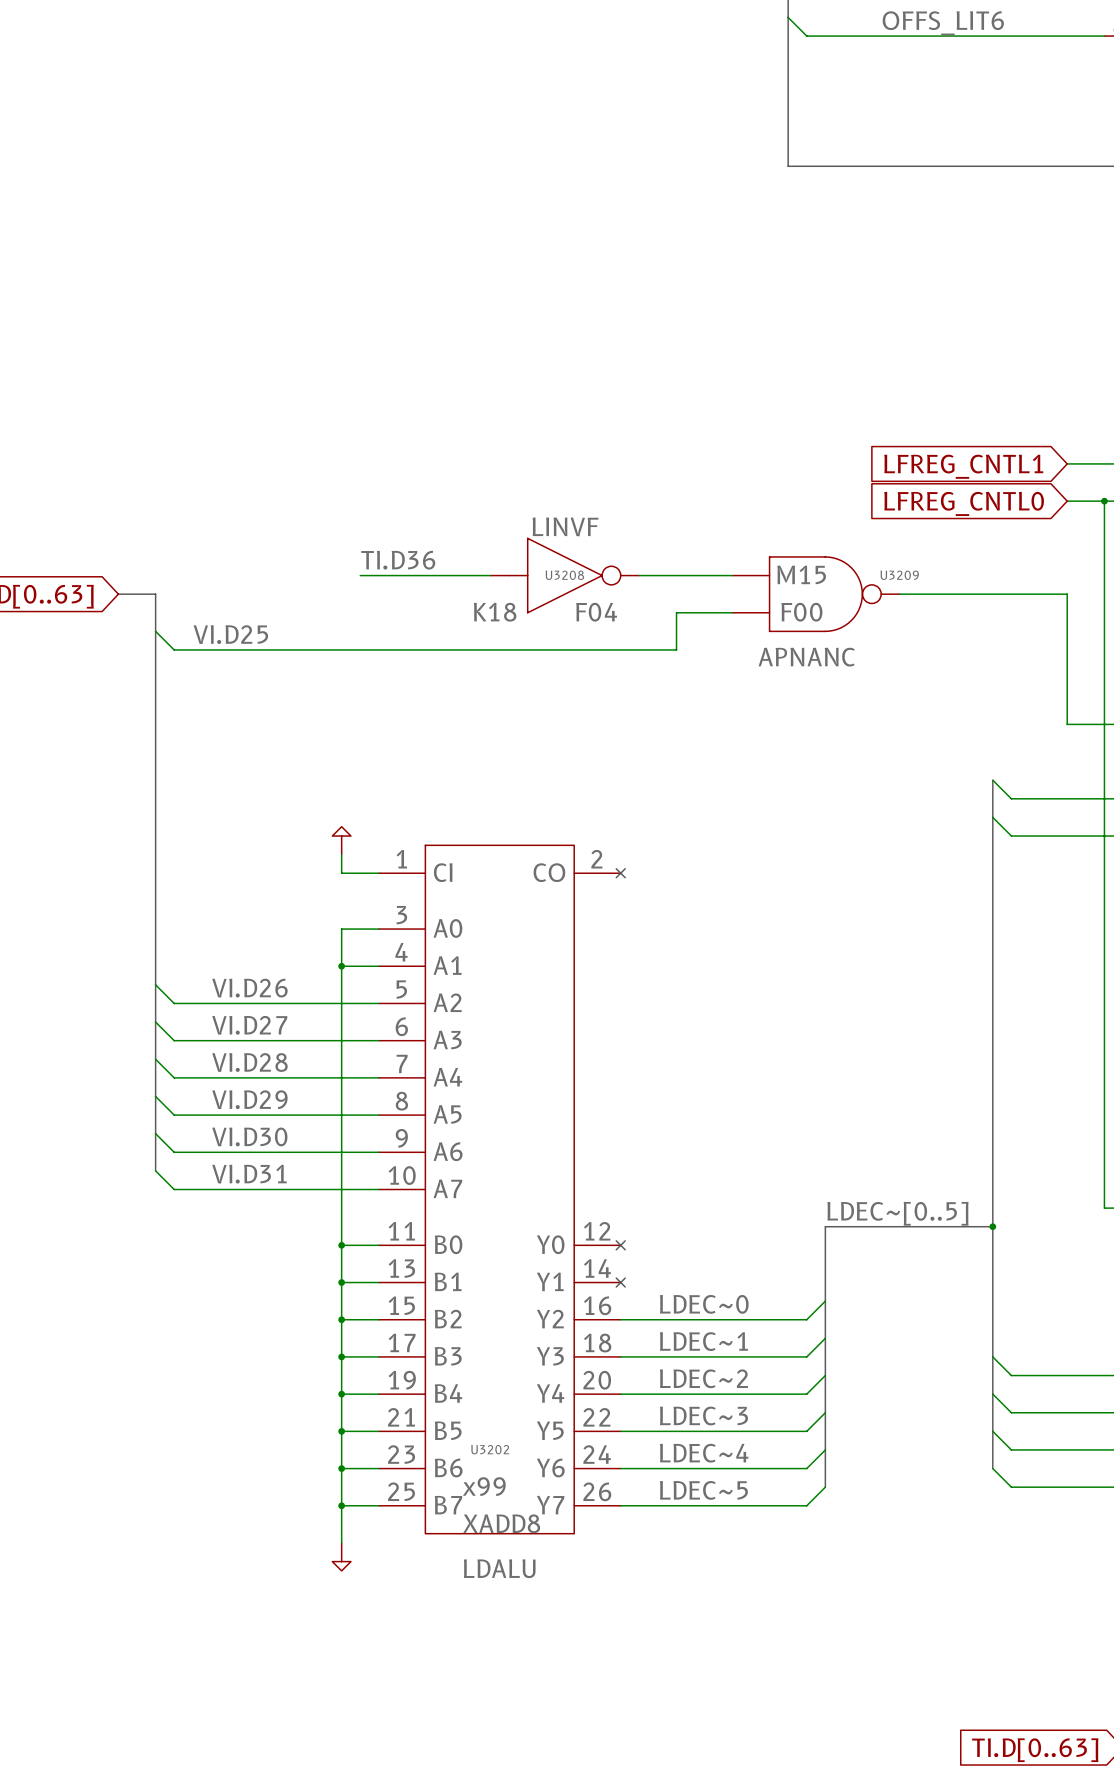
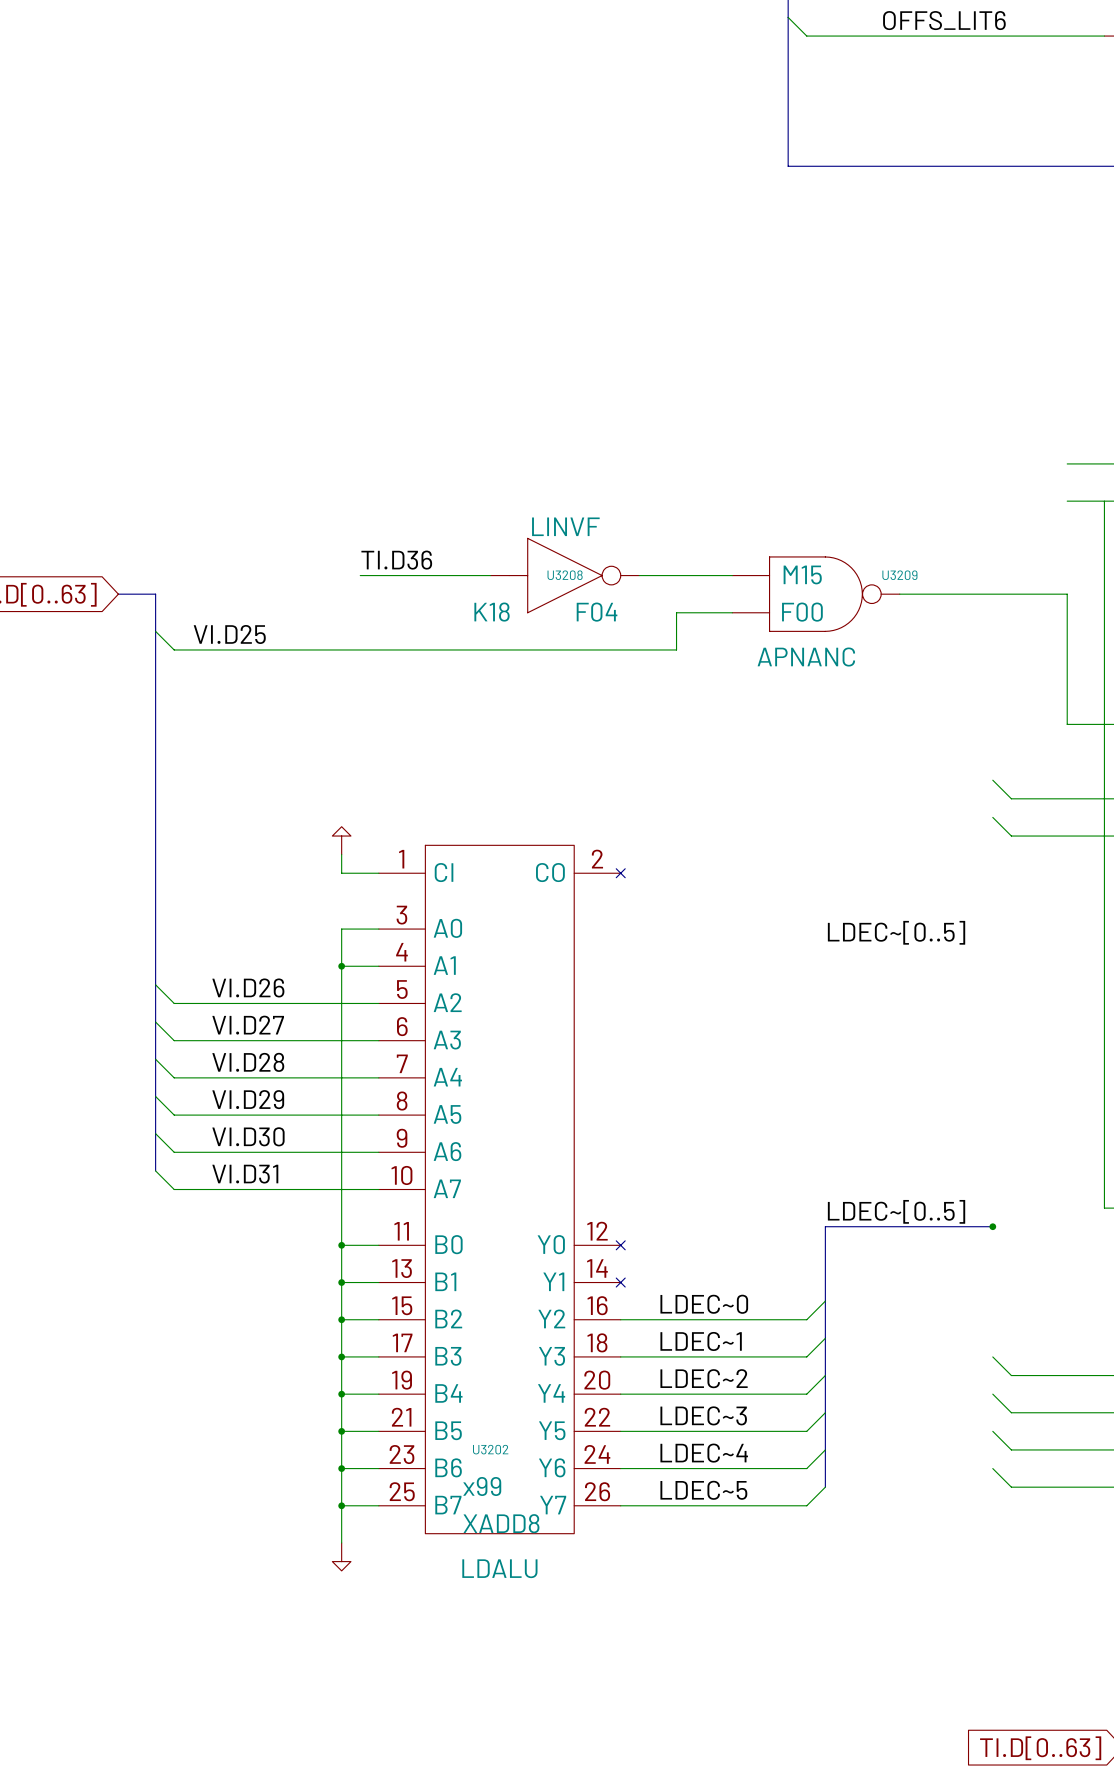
global label: LFREG_CNTL1 (963, 466) -> none
junction: (1104, 501) -> none
global label: LFREG_CNTL0 (964, 503) -> none
bus: (992, 780) (992, 1468) -> none
label: none -> LDEC~[0..5] (896, 932)

